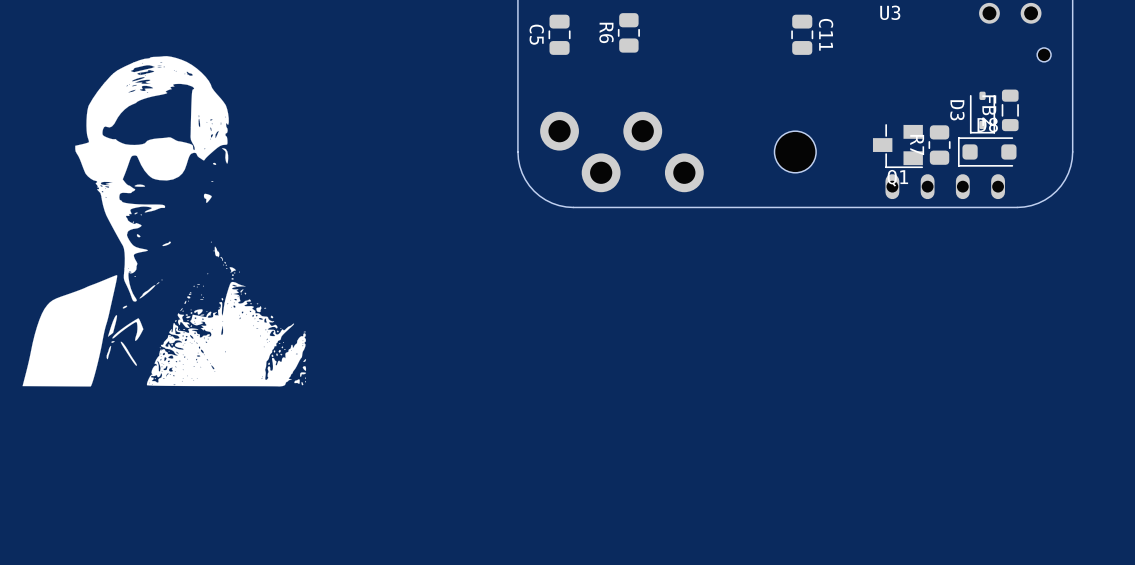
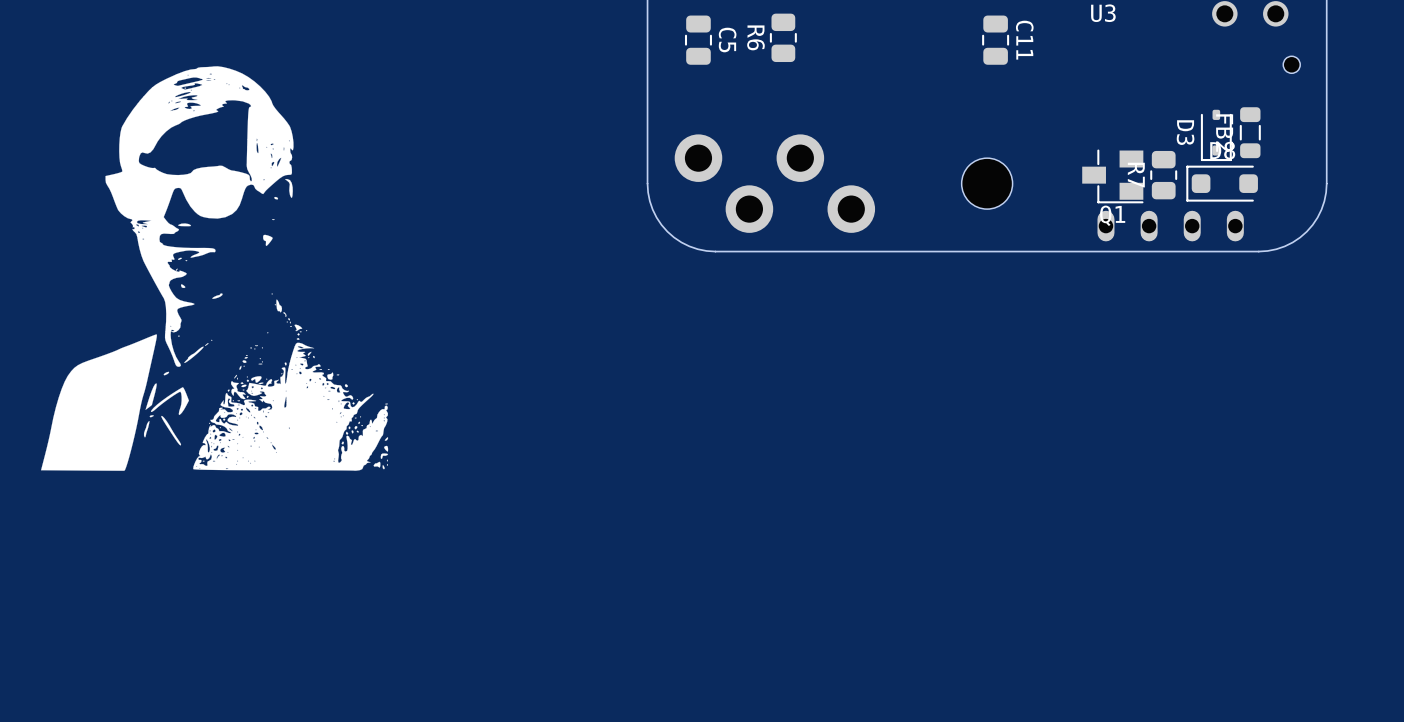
C5 name position: C5 (536, 34) -> C5 (727, 40)

